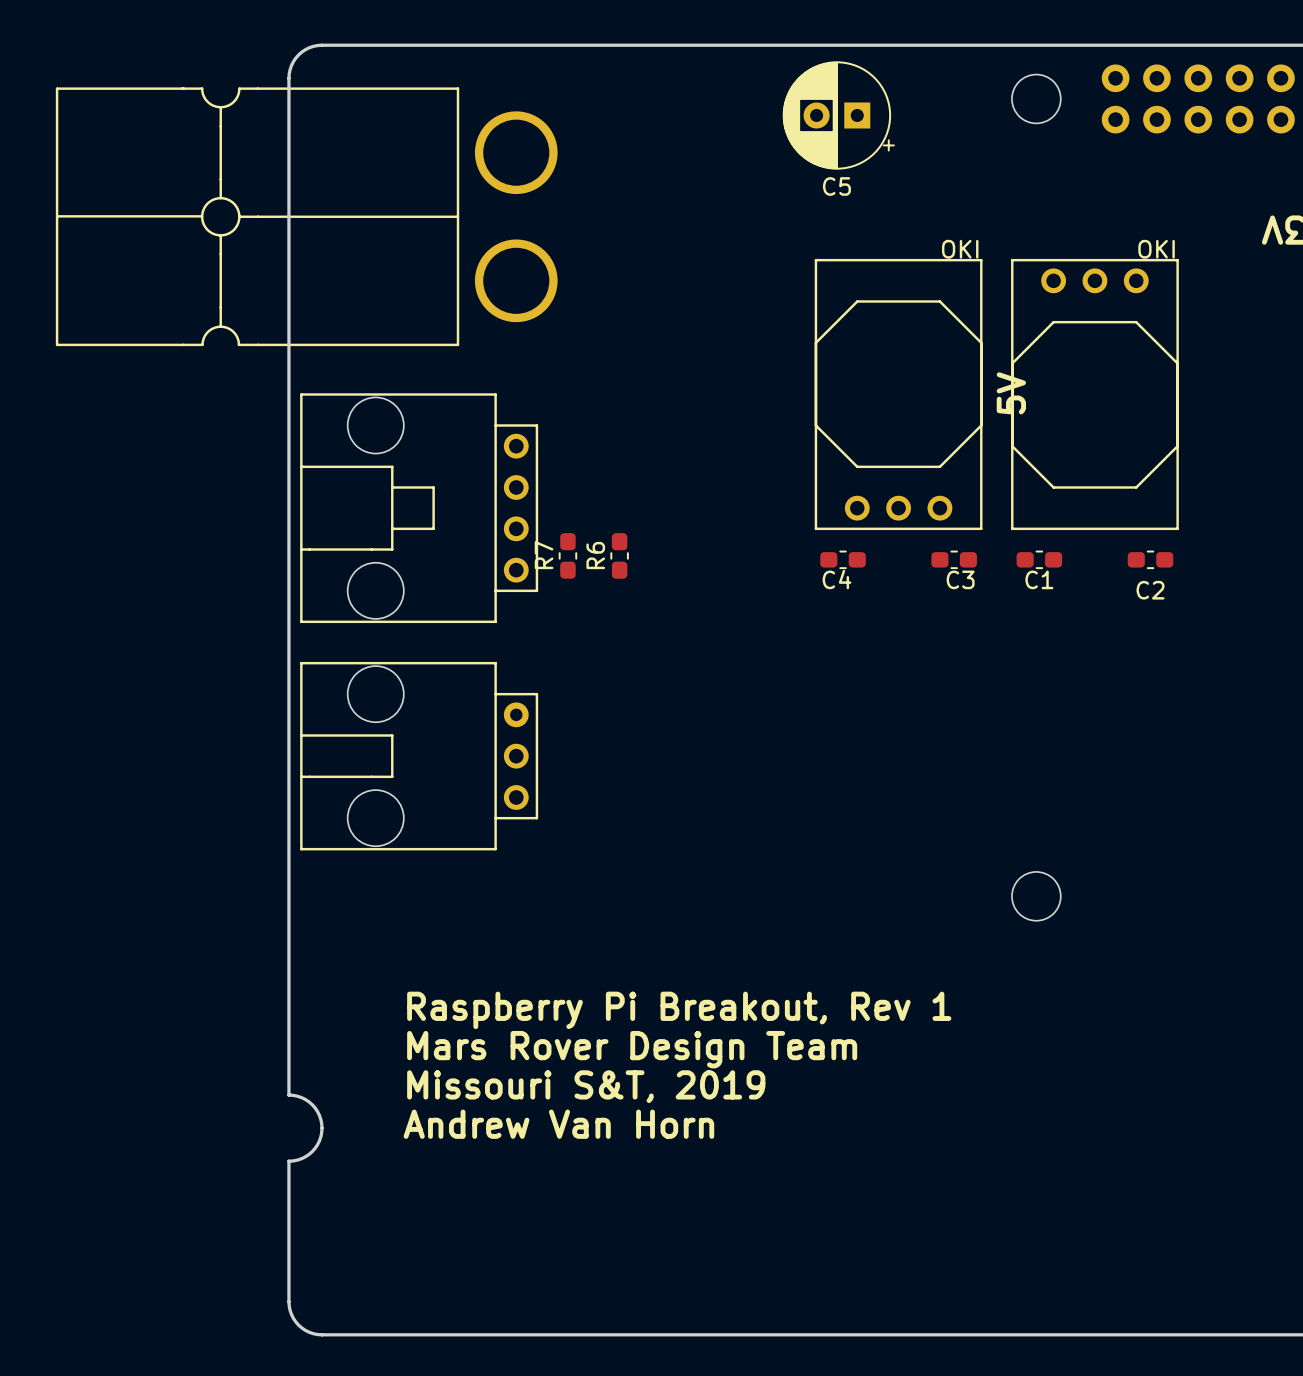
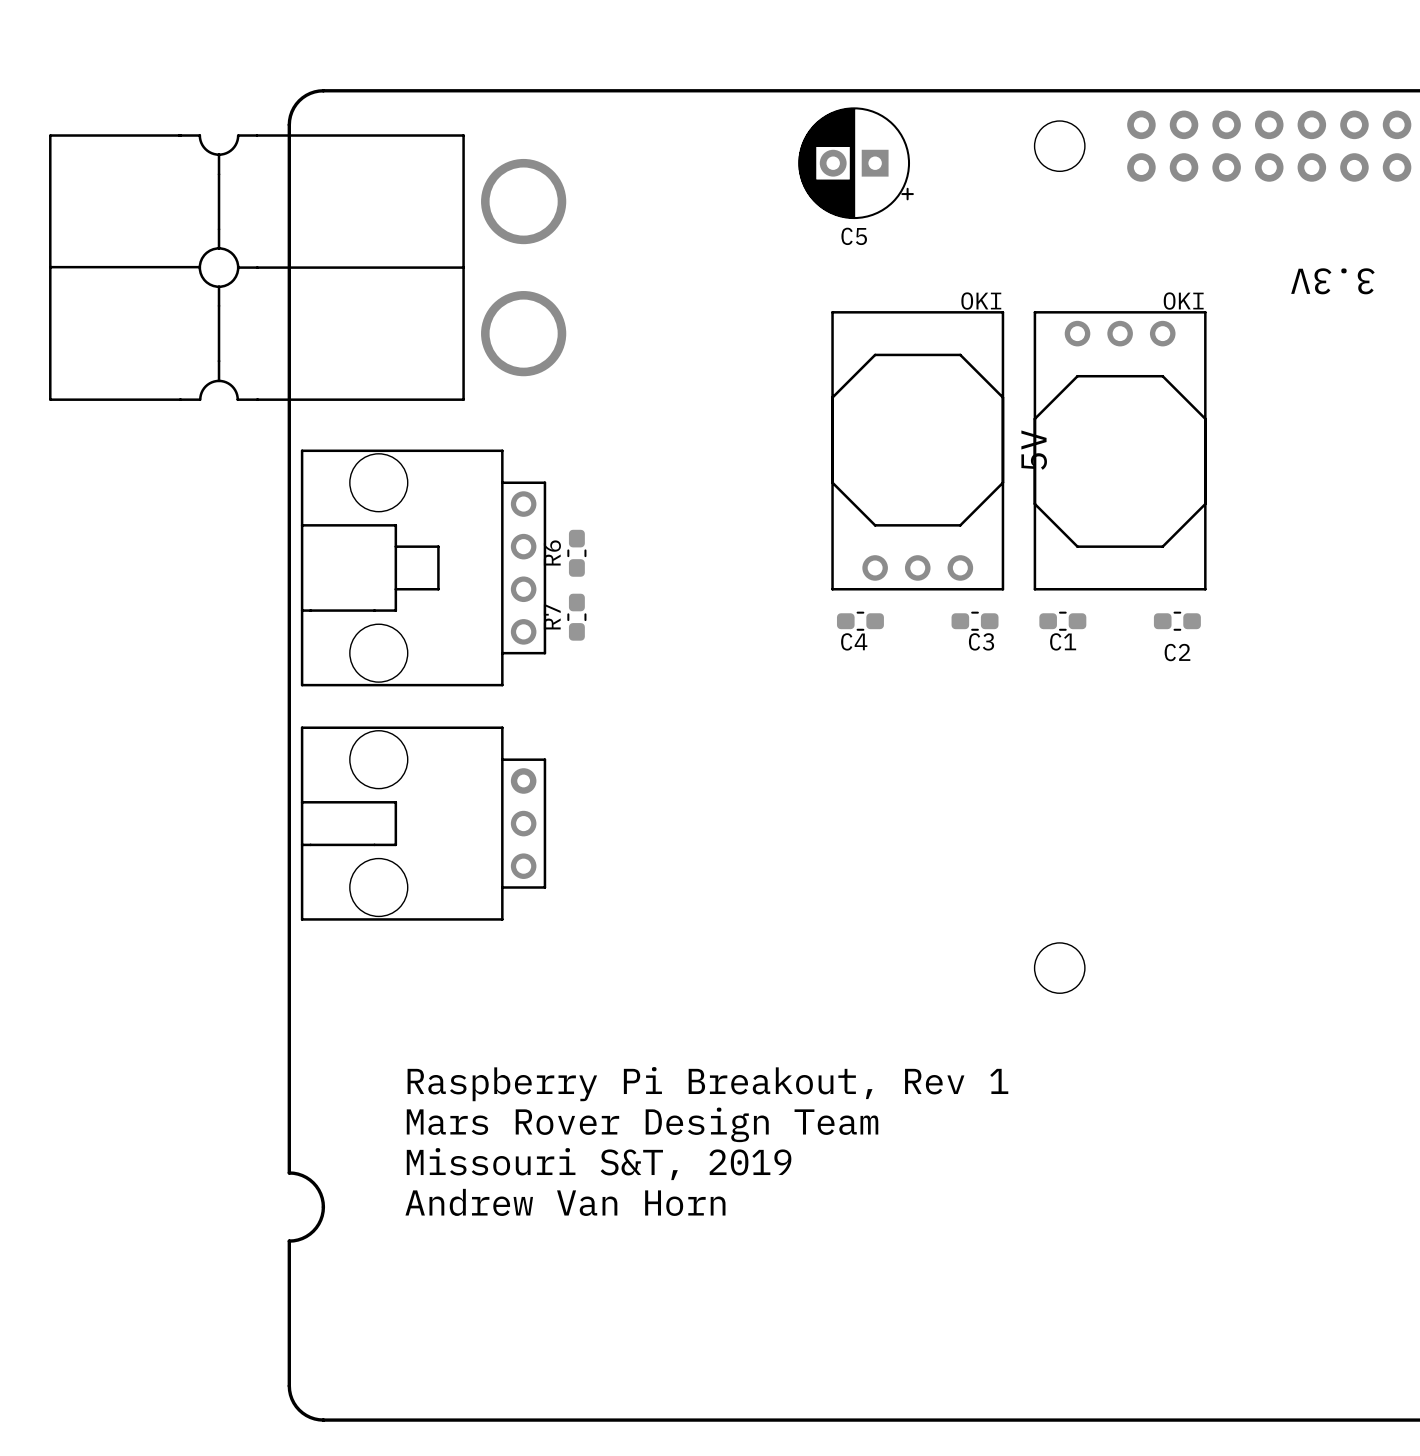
R6 position: (619, 555) -> (576, 553)

